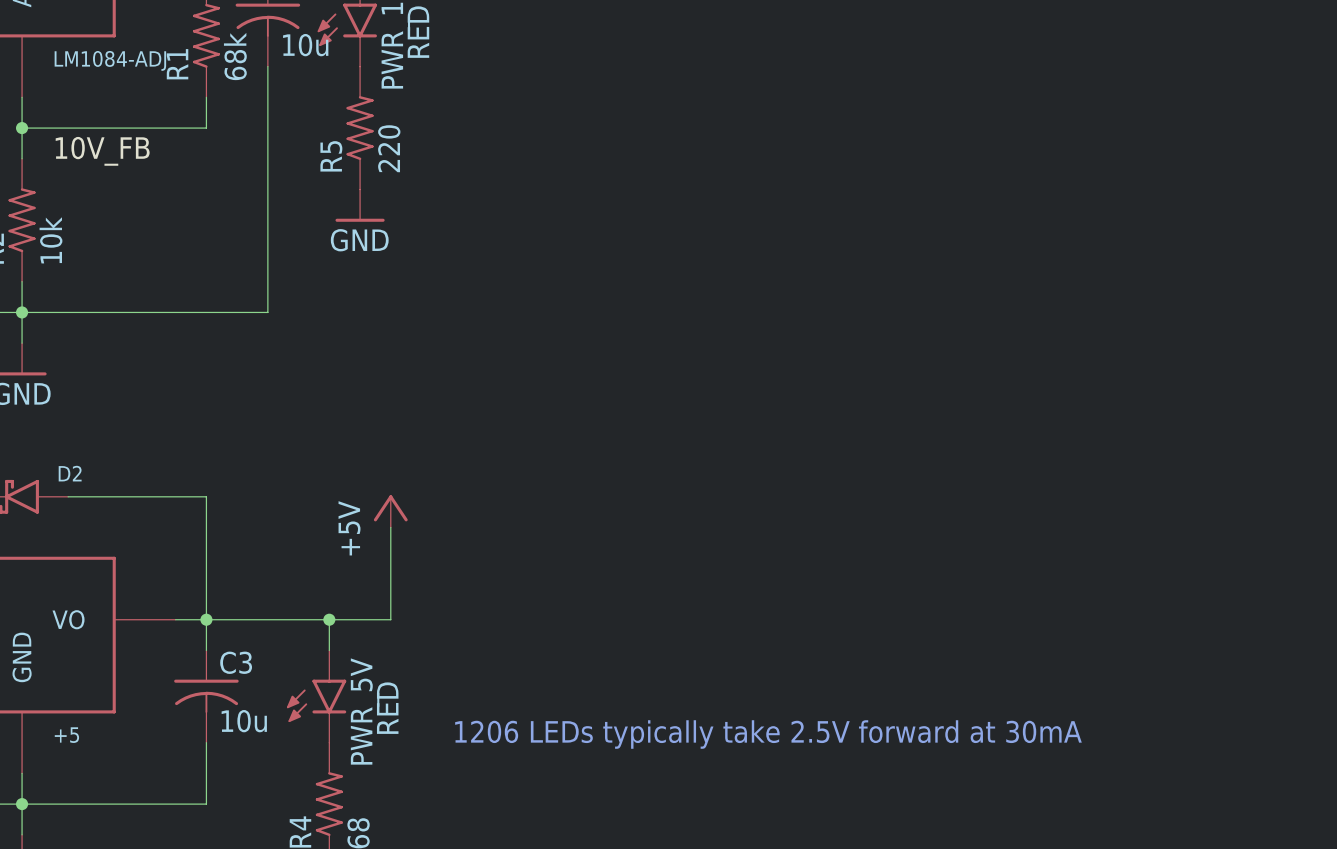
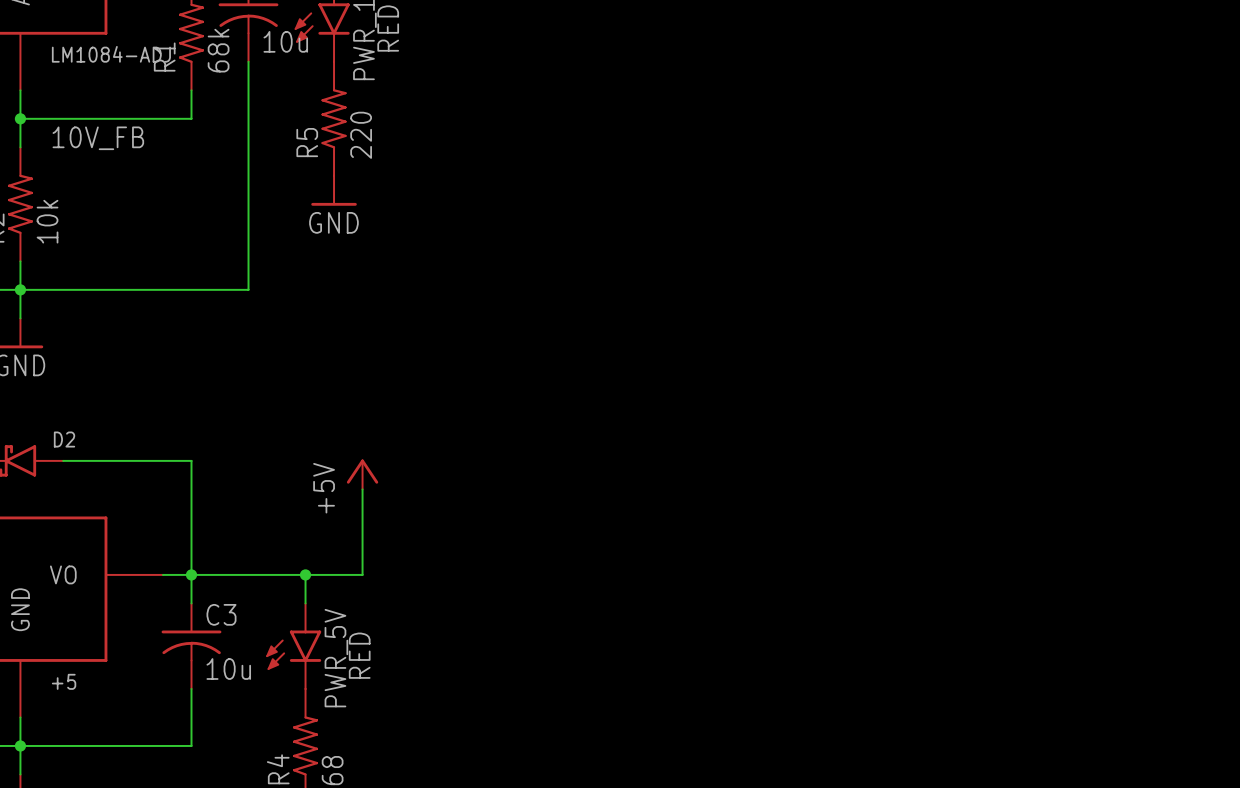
text: 1206 LEDs typically take 2.5V forward at 30mA (768, 734) -> none

